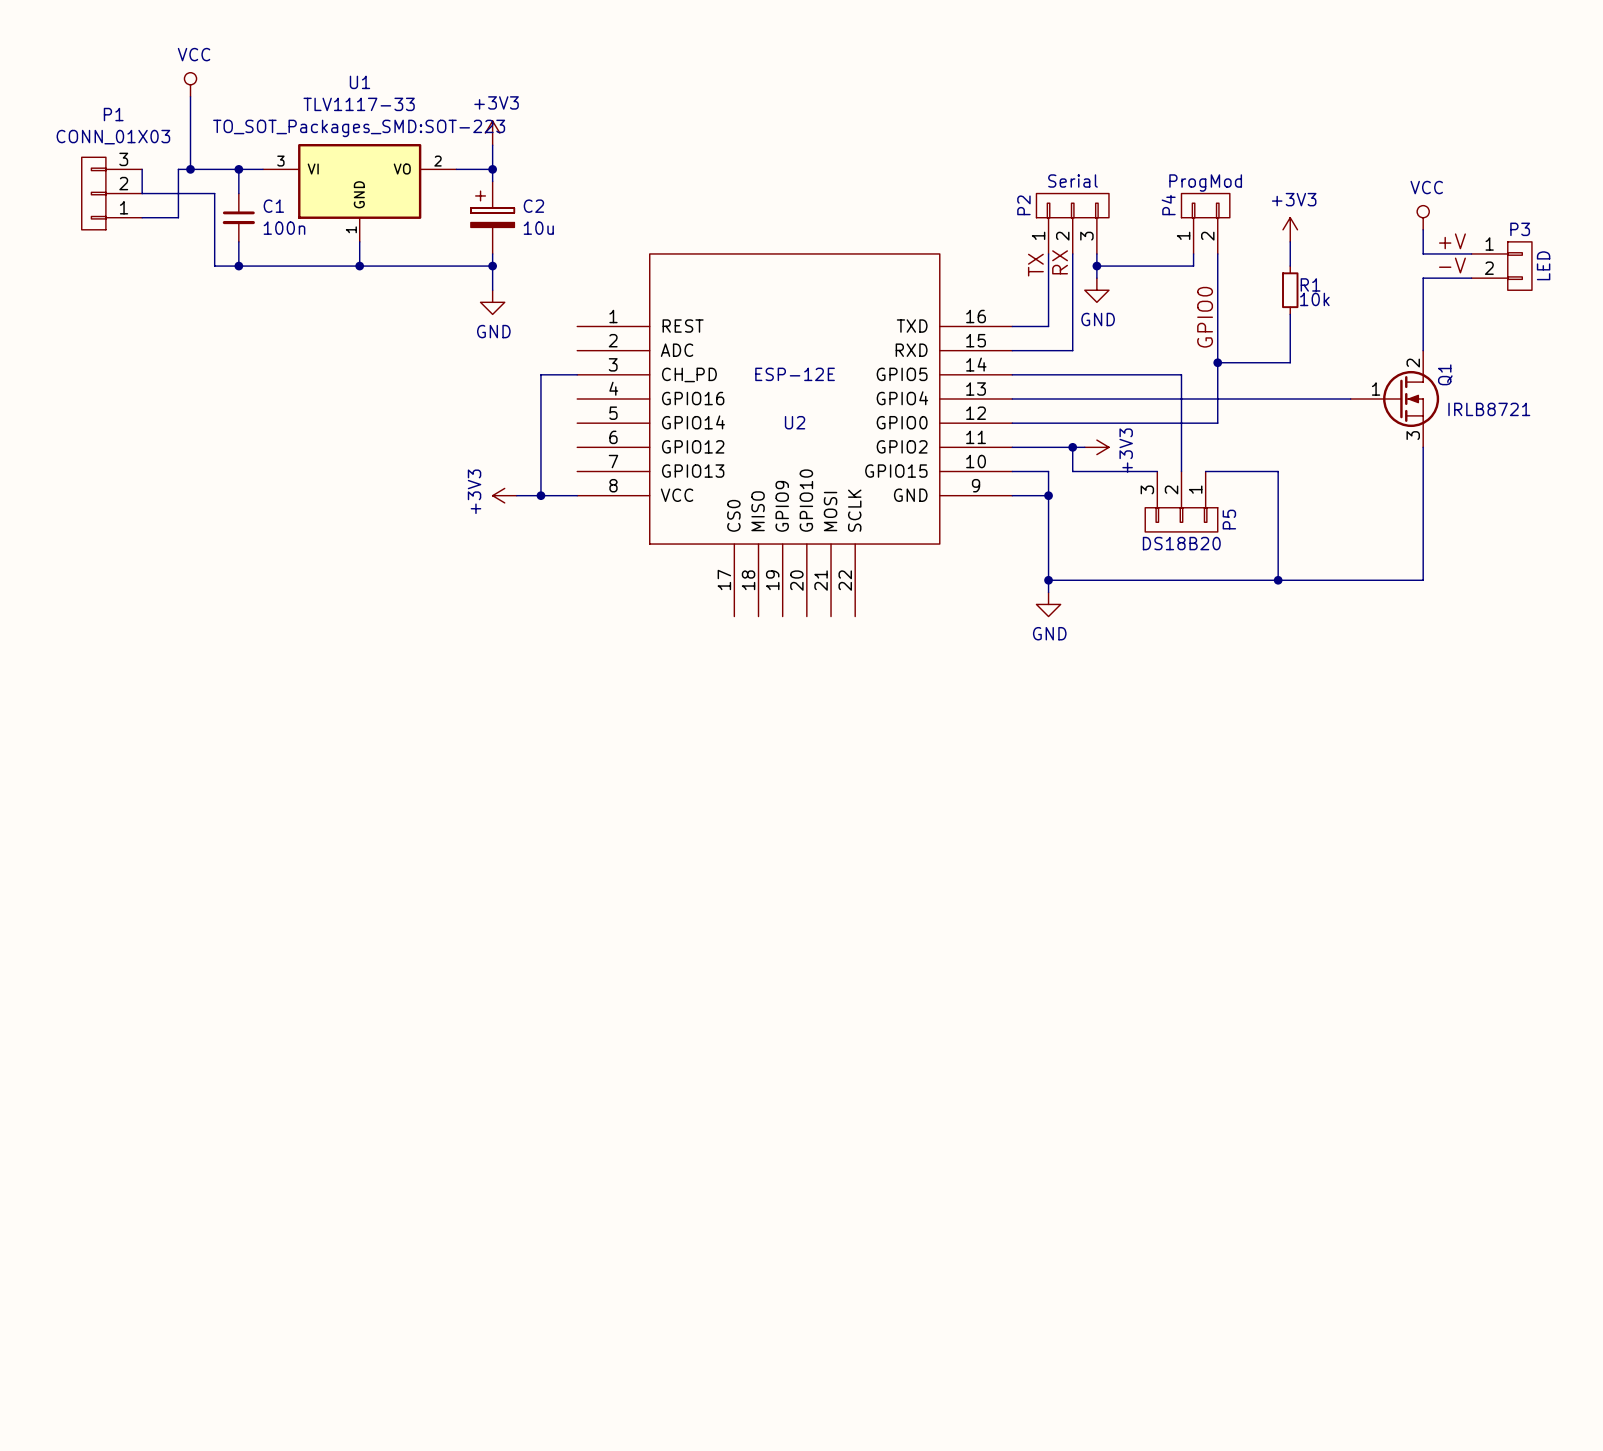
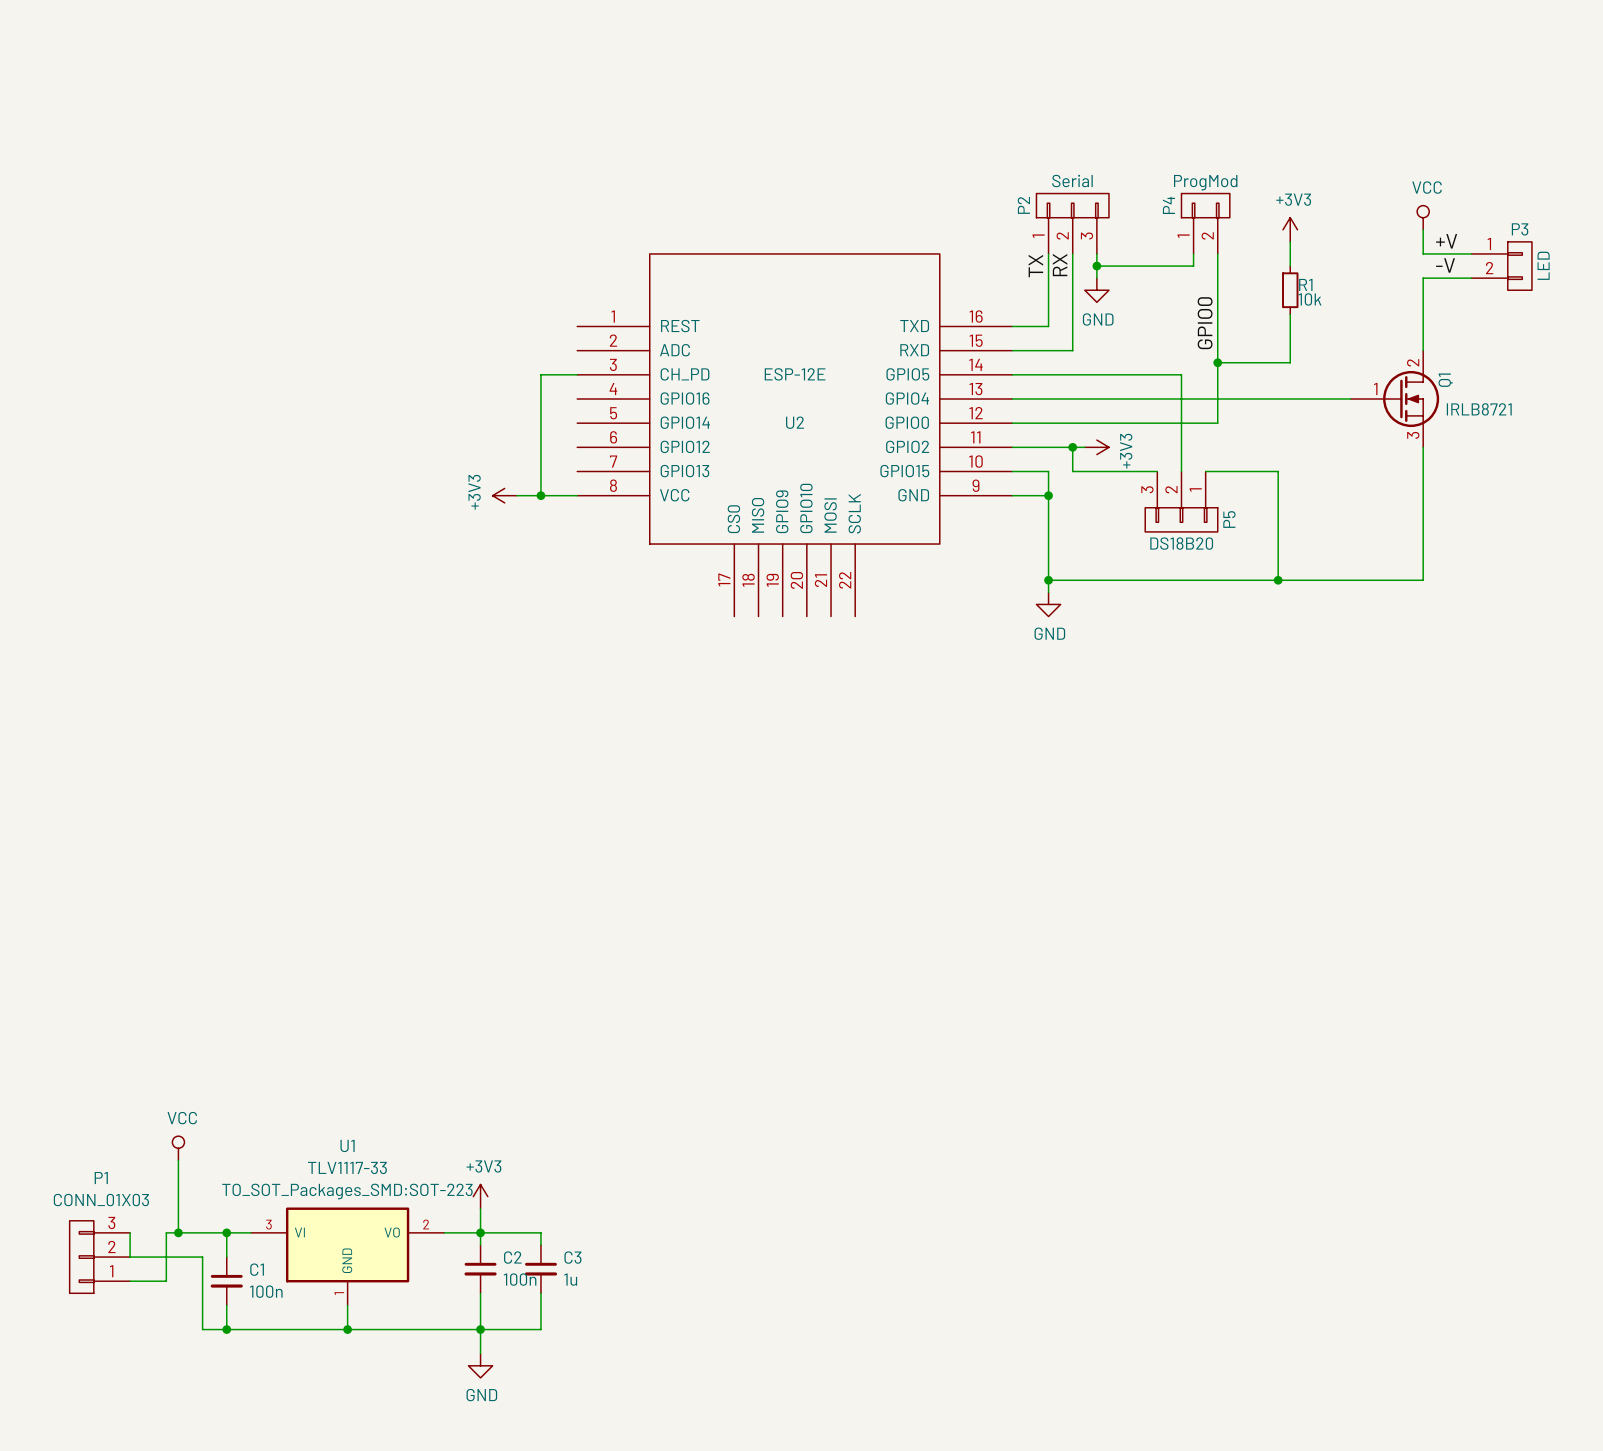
power symbol: VCC (190, 84) -> none
wire: (190, 96) (190, 169) -> none
power symbol: +3V3 (492, 133) -> none
wire: (492, 145) (492, 181) -> none
wire: (142, 169) (142, 193) (214, 193) (214, 266) (492, 266) -> none
junction: (190, 169) -> none
wire: (238, 169) (238, 193) -> none
junction: (238, 169) -> none
wire: (263, 169) (178, 169) (178, 217) (142, 217) -> none
wire: (456, 169) (492, 169) -> none
junction: (492, 169) -> none
C2 symbol: [470, 181, 515, 254] -> [464, 1244, 497, 1294]
U1 position: (359, 192) -> (347, 1256)
P1 position: (111, 193) -> (99, 1257)
C1 position: (238, 217) -> (226, 1281)
C2 value: 10u (538, 228) -> 100n (520, 1279)
wire: (238, 241) (238, 266) -> none
wire: (359, 241) (359, 266) -> none
wire: (492, 253) (492, 290) -> none
junction: (238, 266) -> none
junction: (359, 266) -> none
junction: (492, 266) -> none
power symbol: GND (492, 302) -> none
power symbol: none -> VCC (178, 1148)
wire: none -> (178, 1160) (178, 1232)
power symbol: none -> +3V3 (480, 1196)
wire: none -> (480, 1208) (480, 1244)
wire: none -> (130, 1232) (130, 1257) (202, 1257) (202, 1329) (540, 1329) (540, 1293)
junction: none -> (178, 1232)
wire: none -> (226, 1232) (226, 1257)
junction: none -> (226, 1232)
wire: none -> (250, 1232) (166, 1232) (166, 1281) (130, 1281)
wire: none -> (444, 1232) (540, 1232) (540, 1244)
junction: none -> (480, 1232)
C3: none -> 1u (540, 1269)
wire: none -> (480, 1293) (480, 1353)
wire: none -> (226, 1305) (226, 1329)
wire: none -> (347, 1305) (347, 1329)
junction: none -> (226, 1329)
junction: none -> (347, 1329)
junction: none -> (480, 1329)
power symbol: none -> GND (480, 1365)

